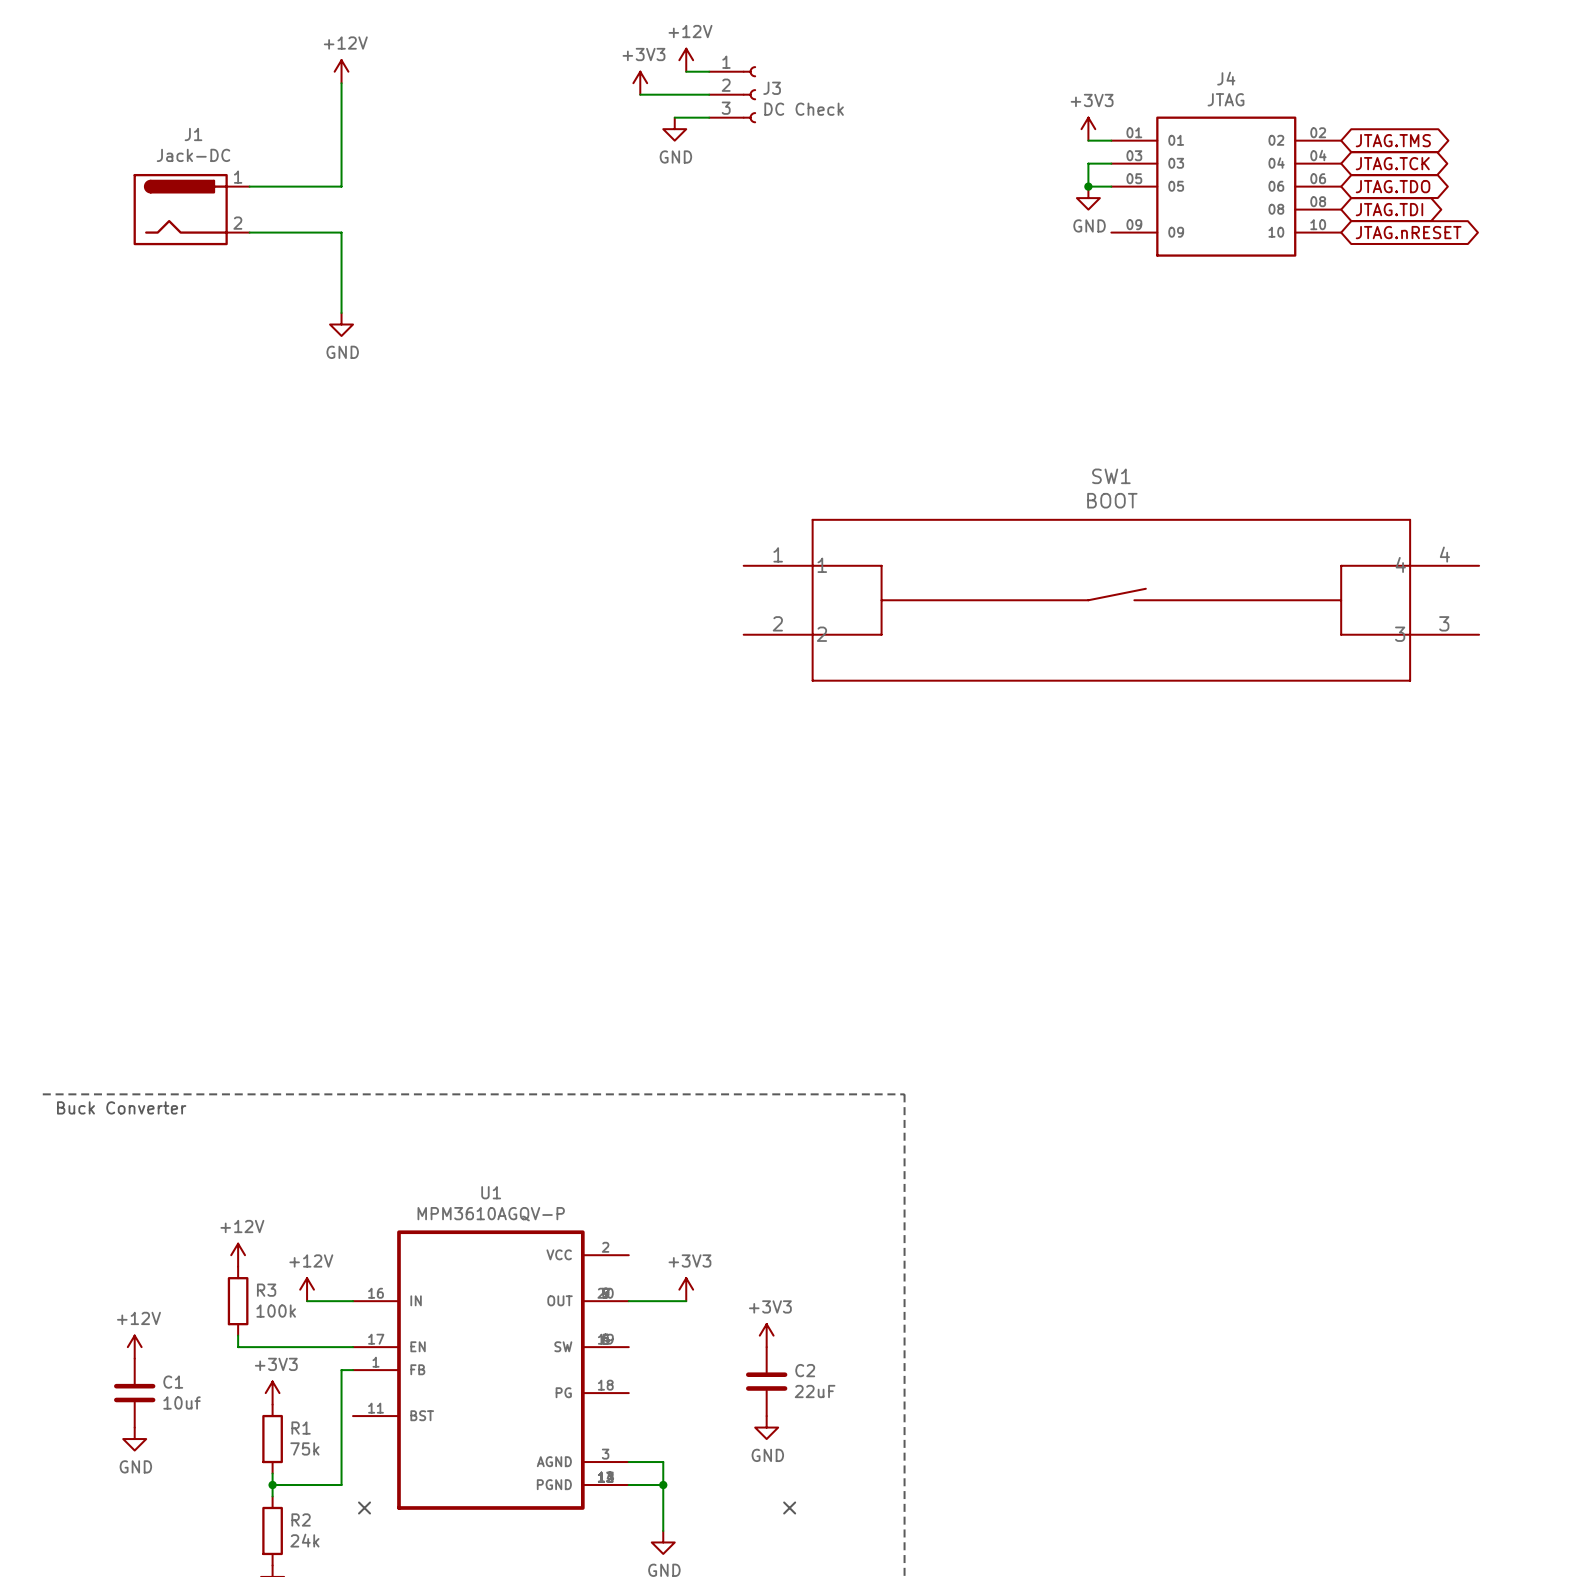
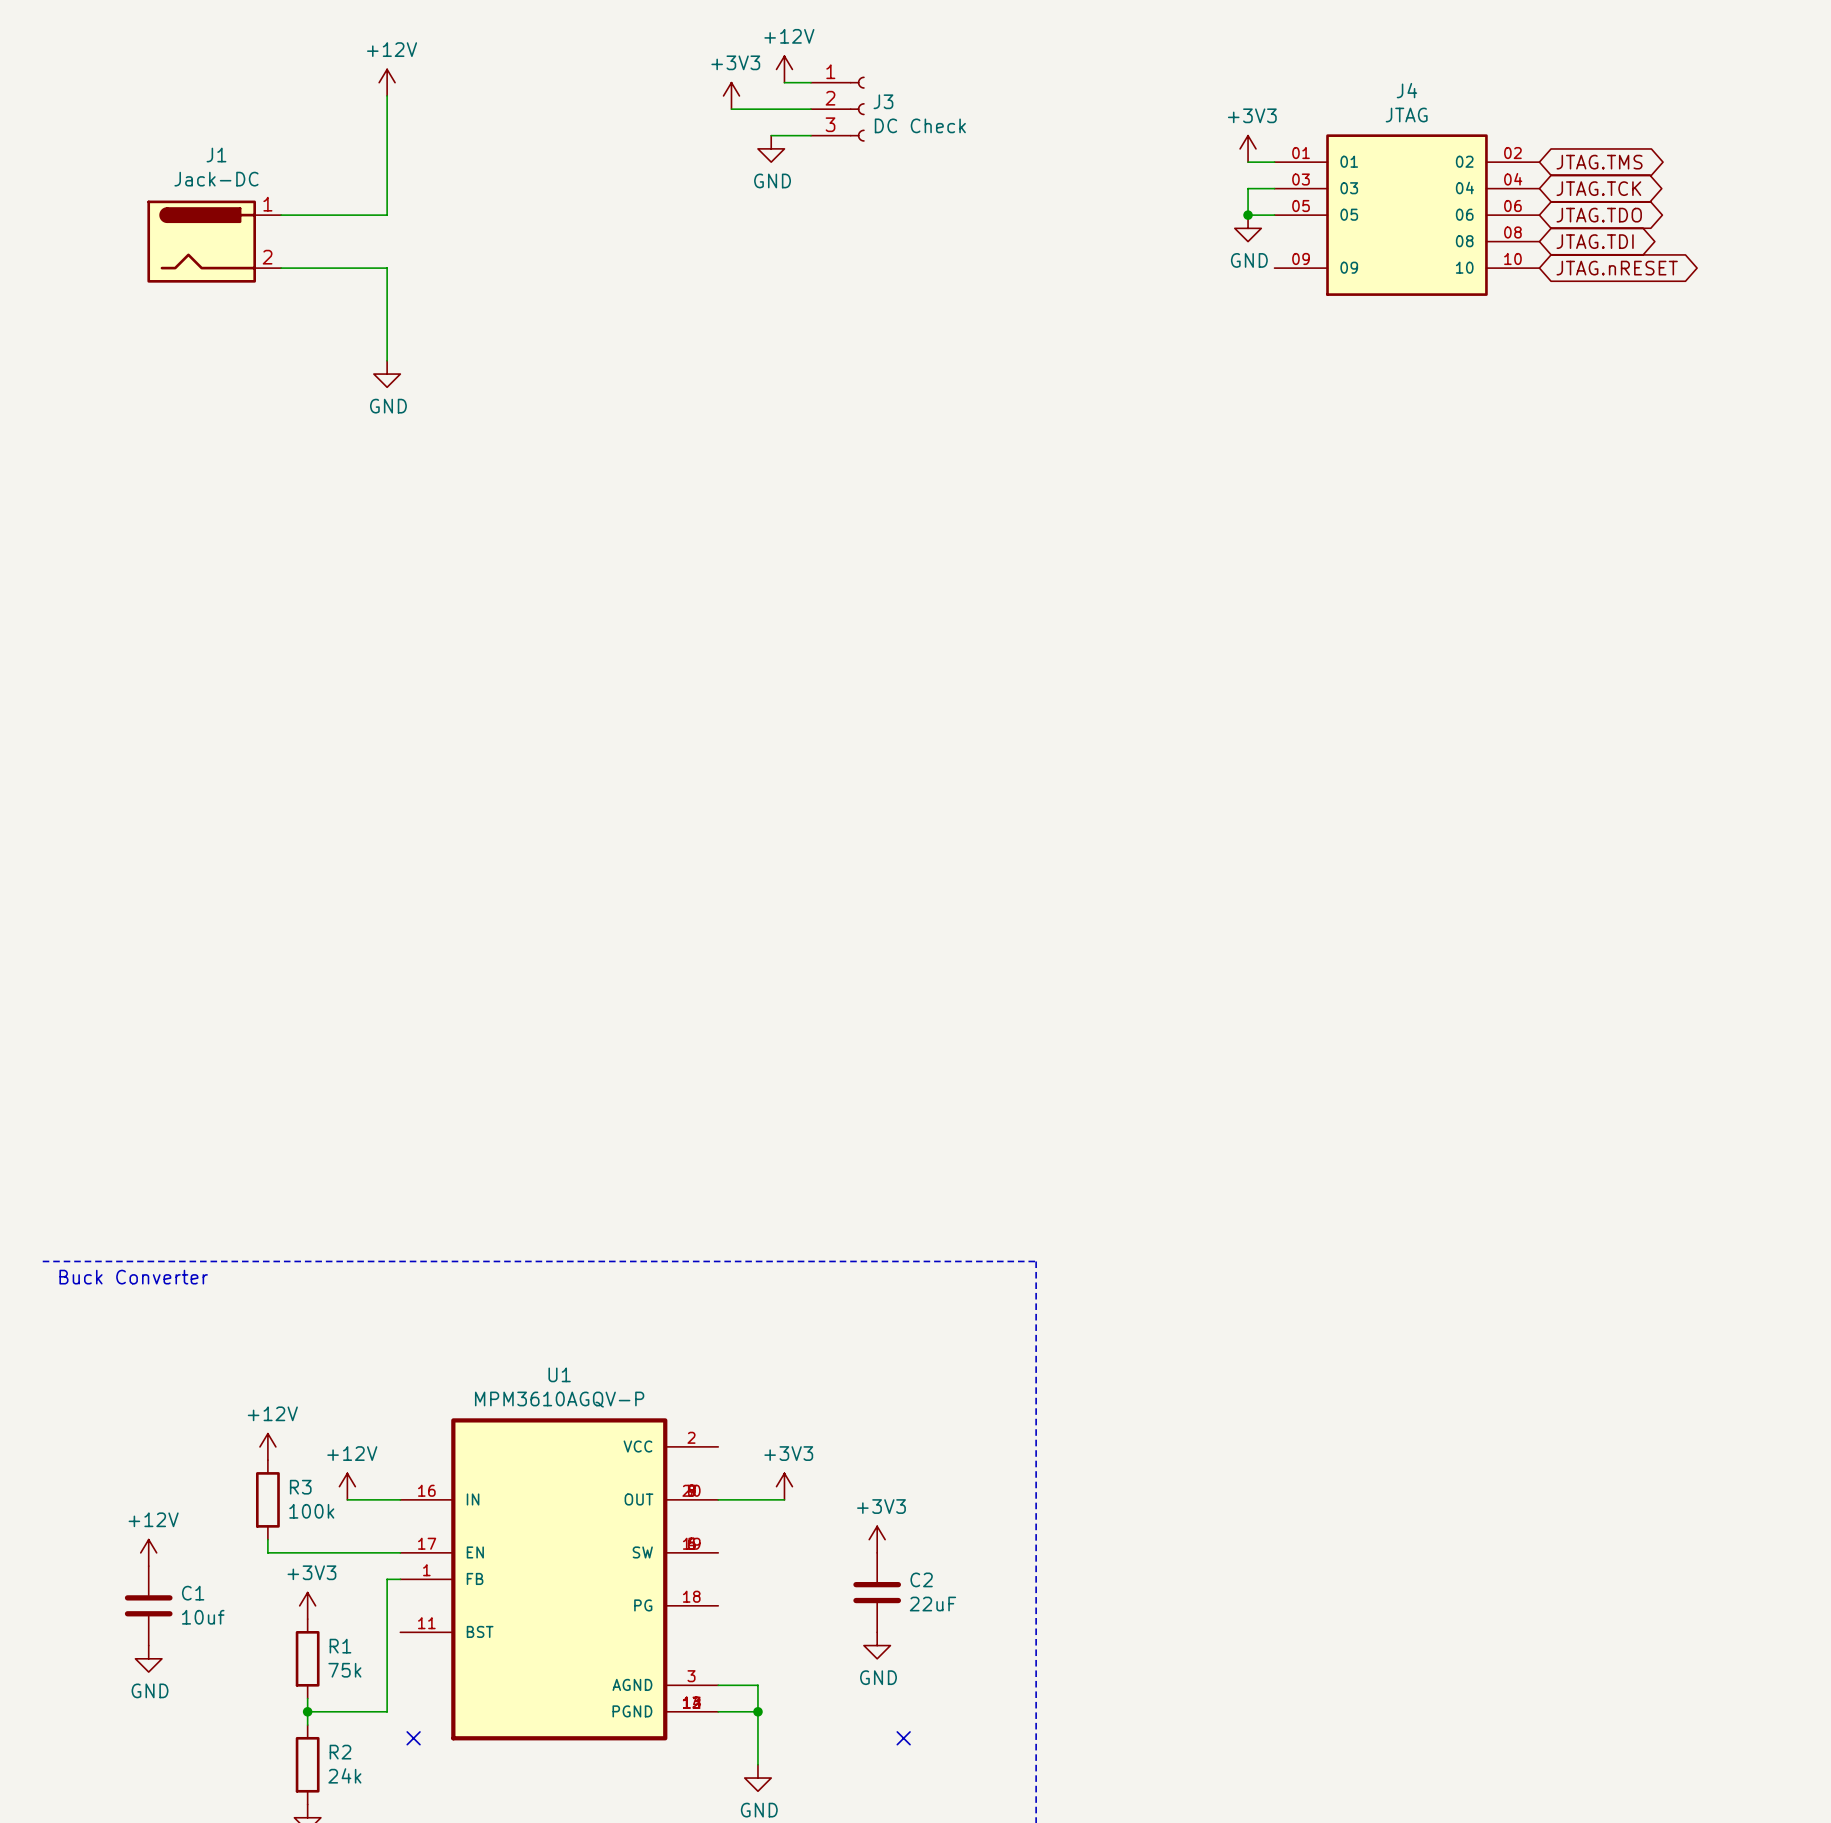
SW1: BOOT (1111, 600) -> none

